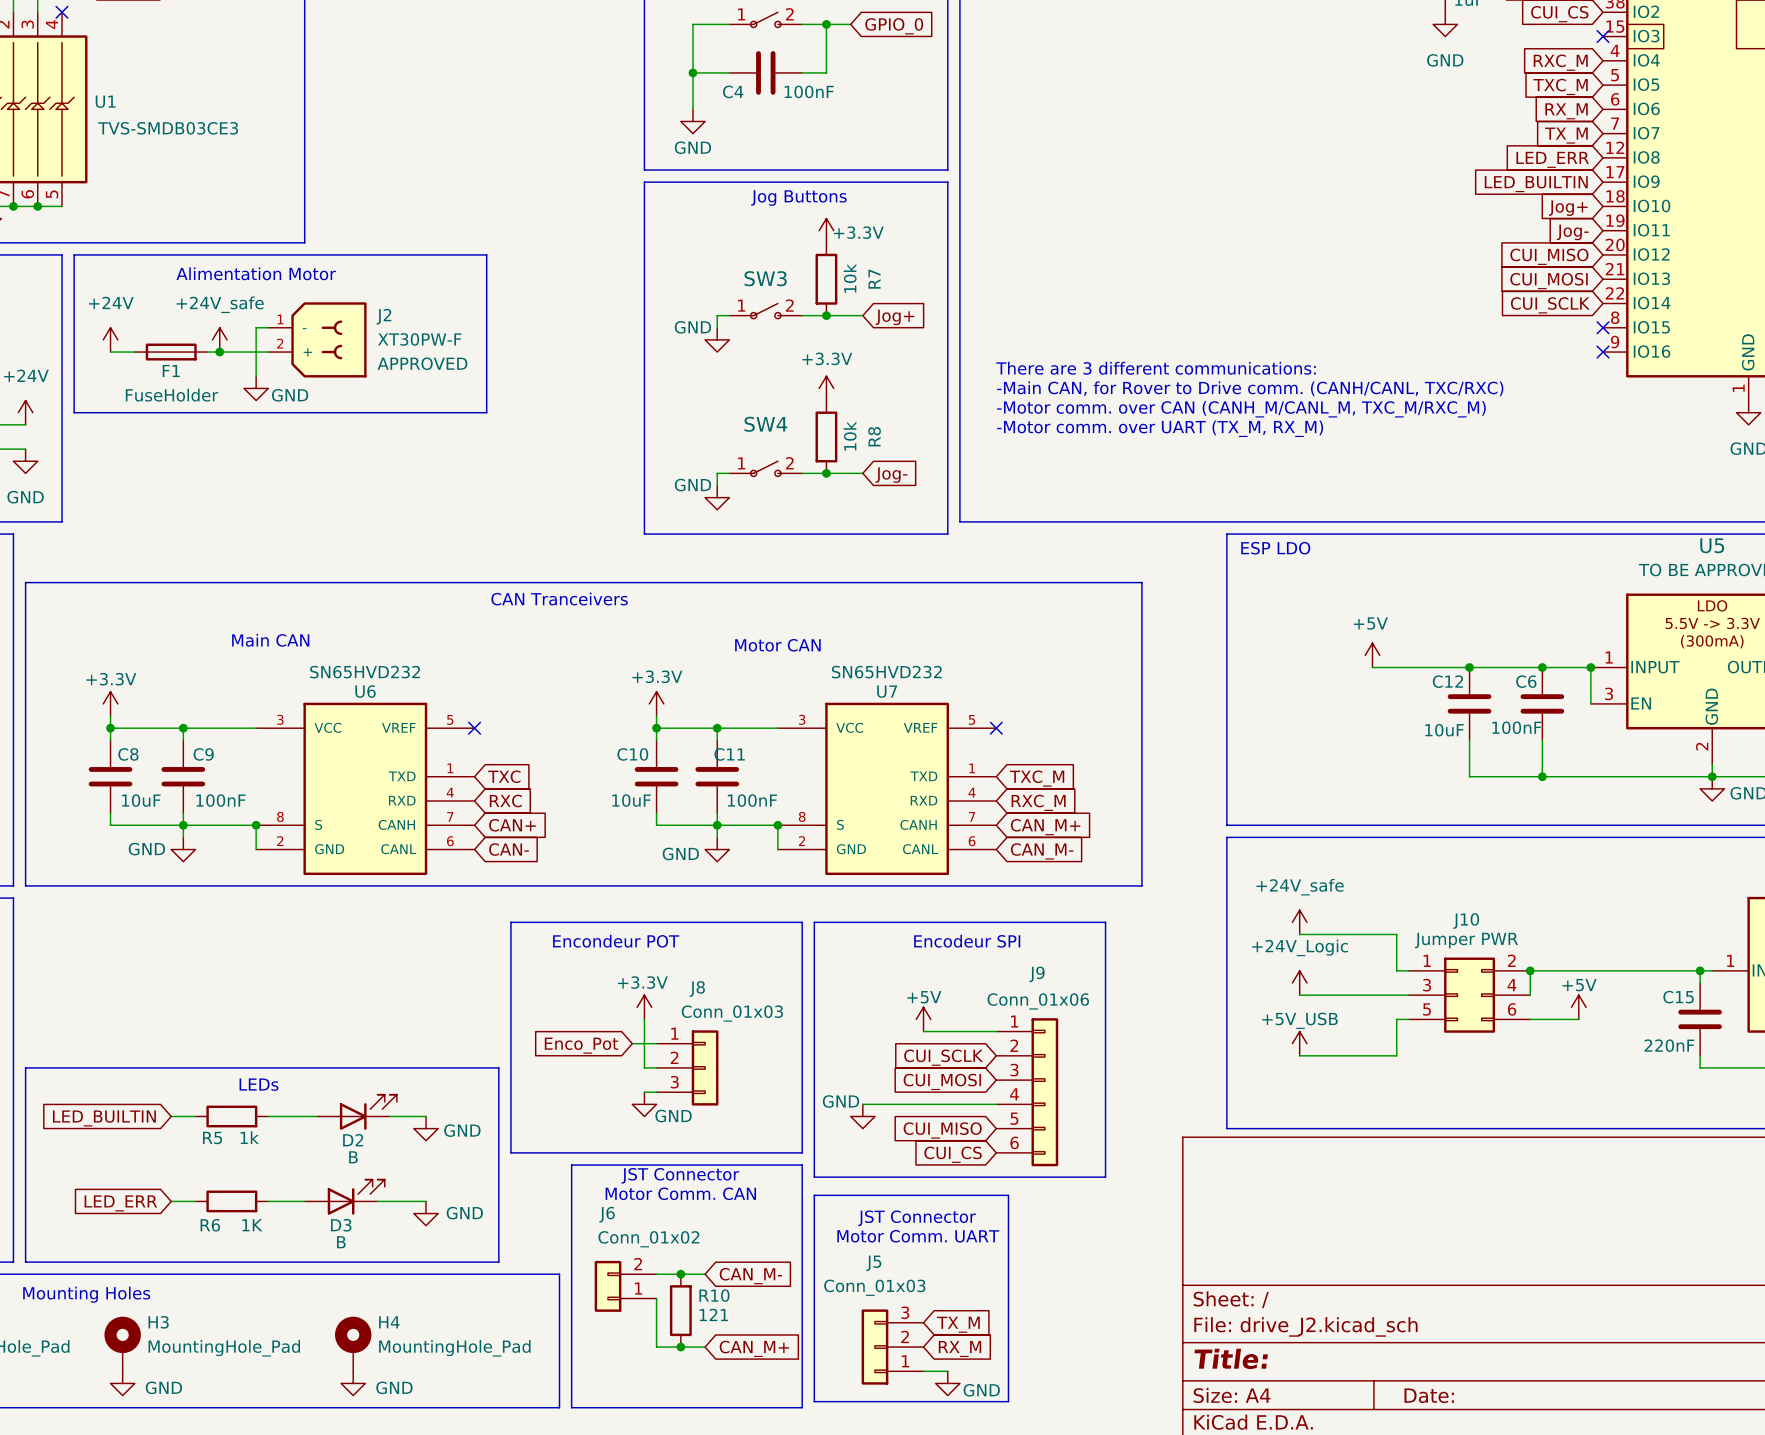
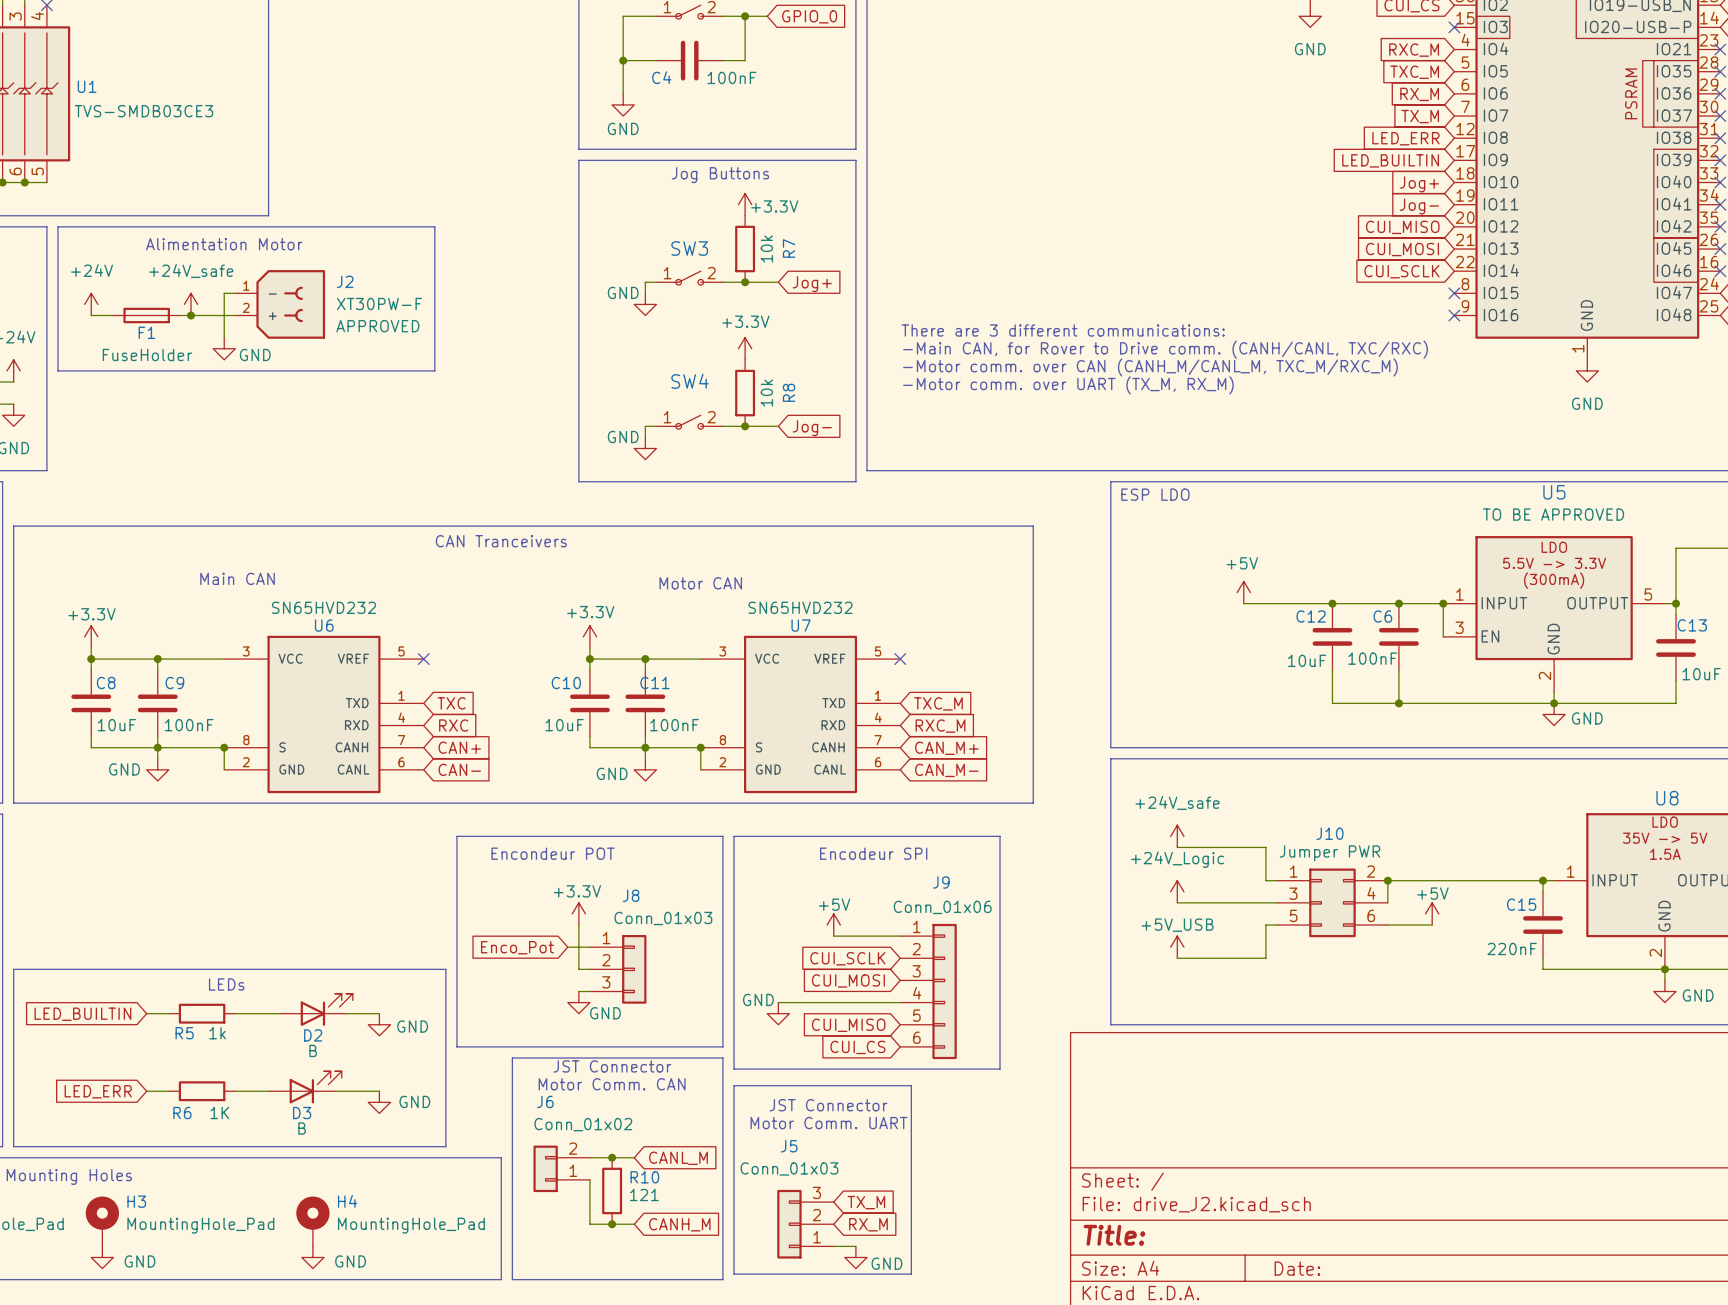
global label: CAN_M- (750, 1276) -> CANL_M (678, 1158)
global label: CAN_M+ (754, 1348) -> CANH_M (679, 1224)

